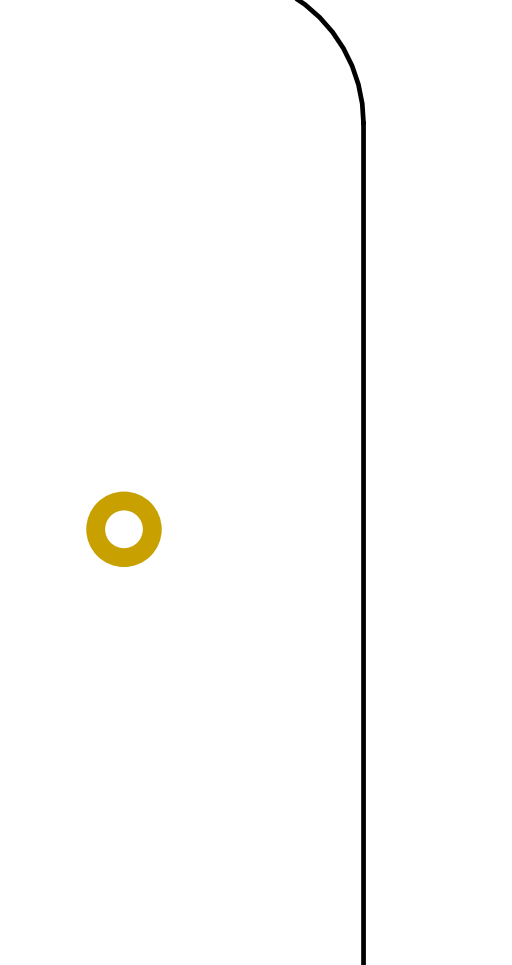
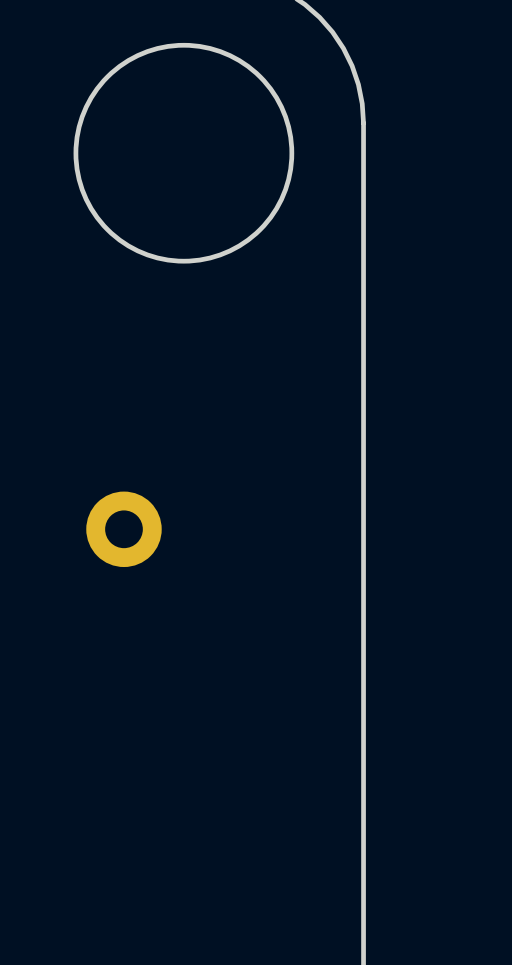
round board edge: none -> [73, 42, 295, 264]

